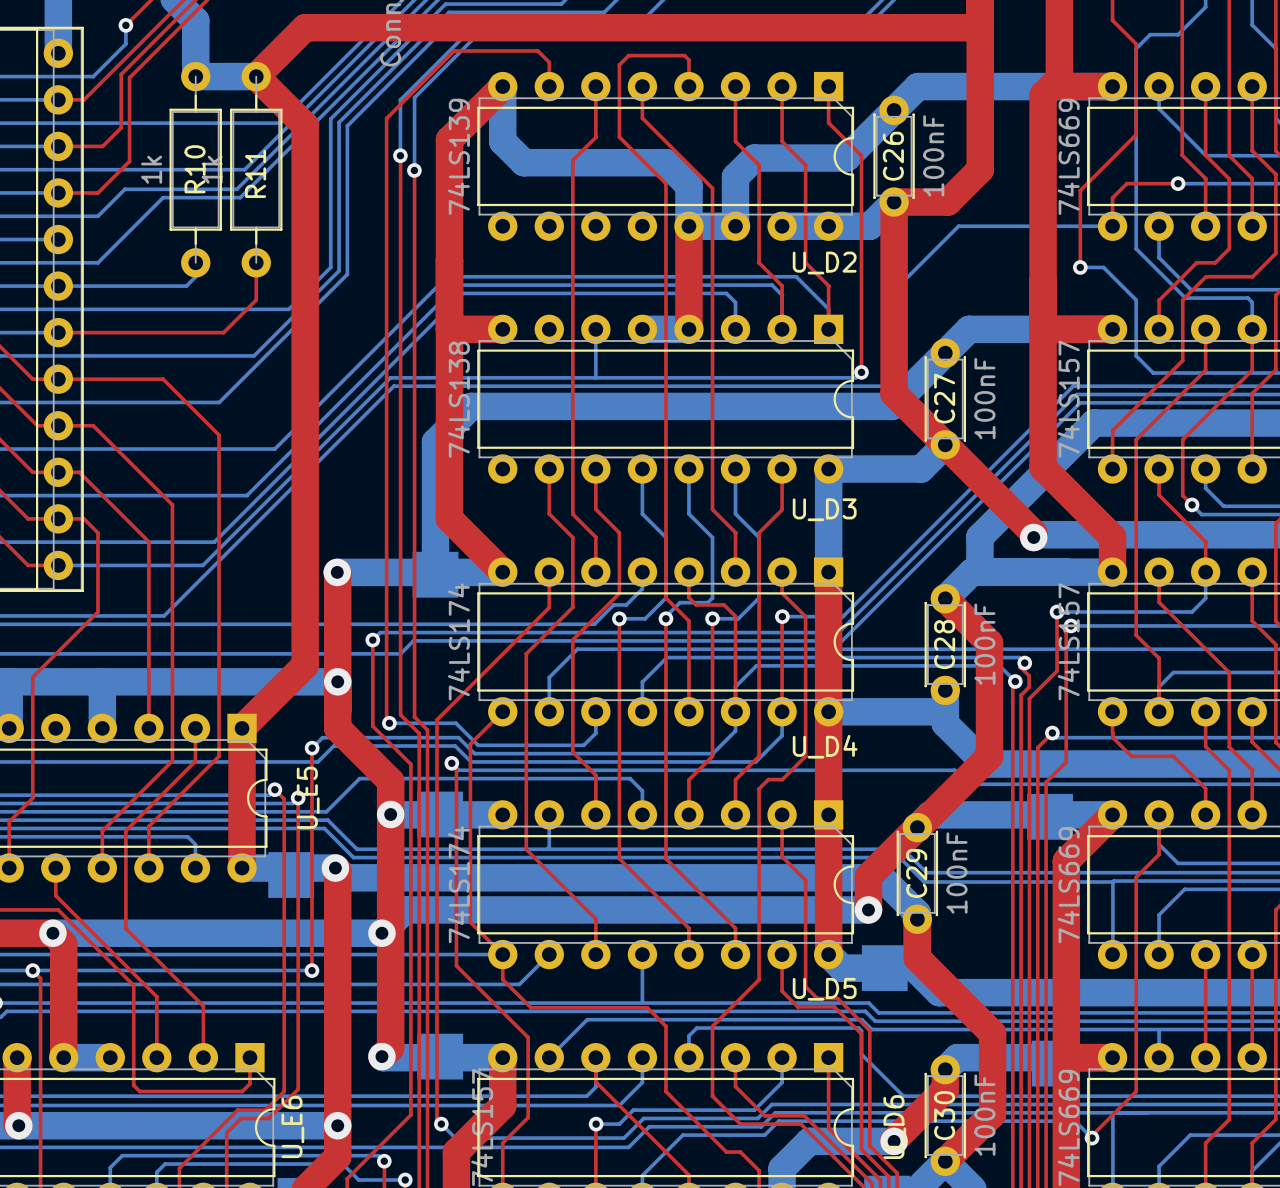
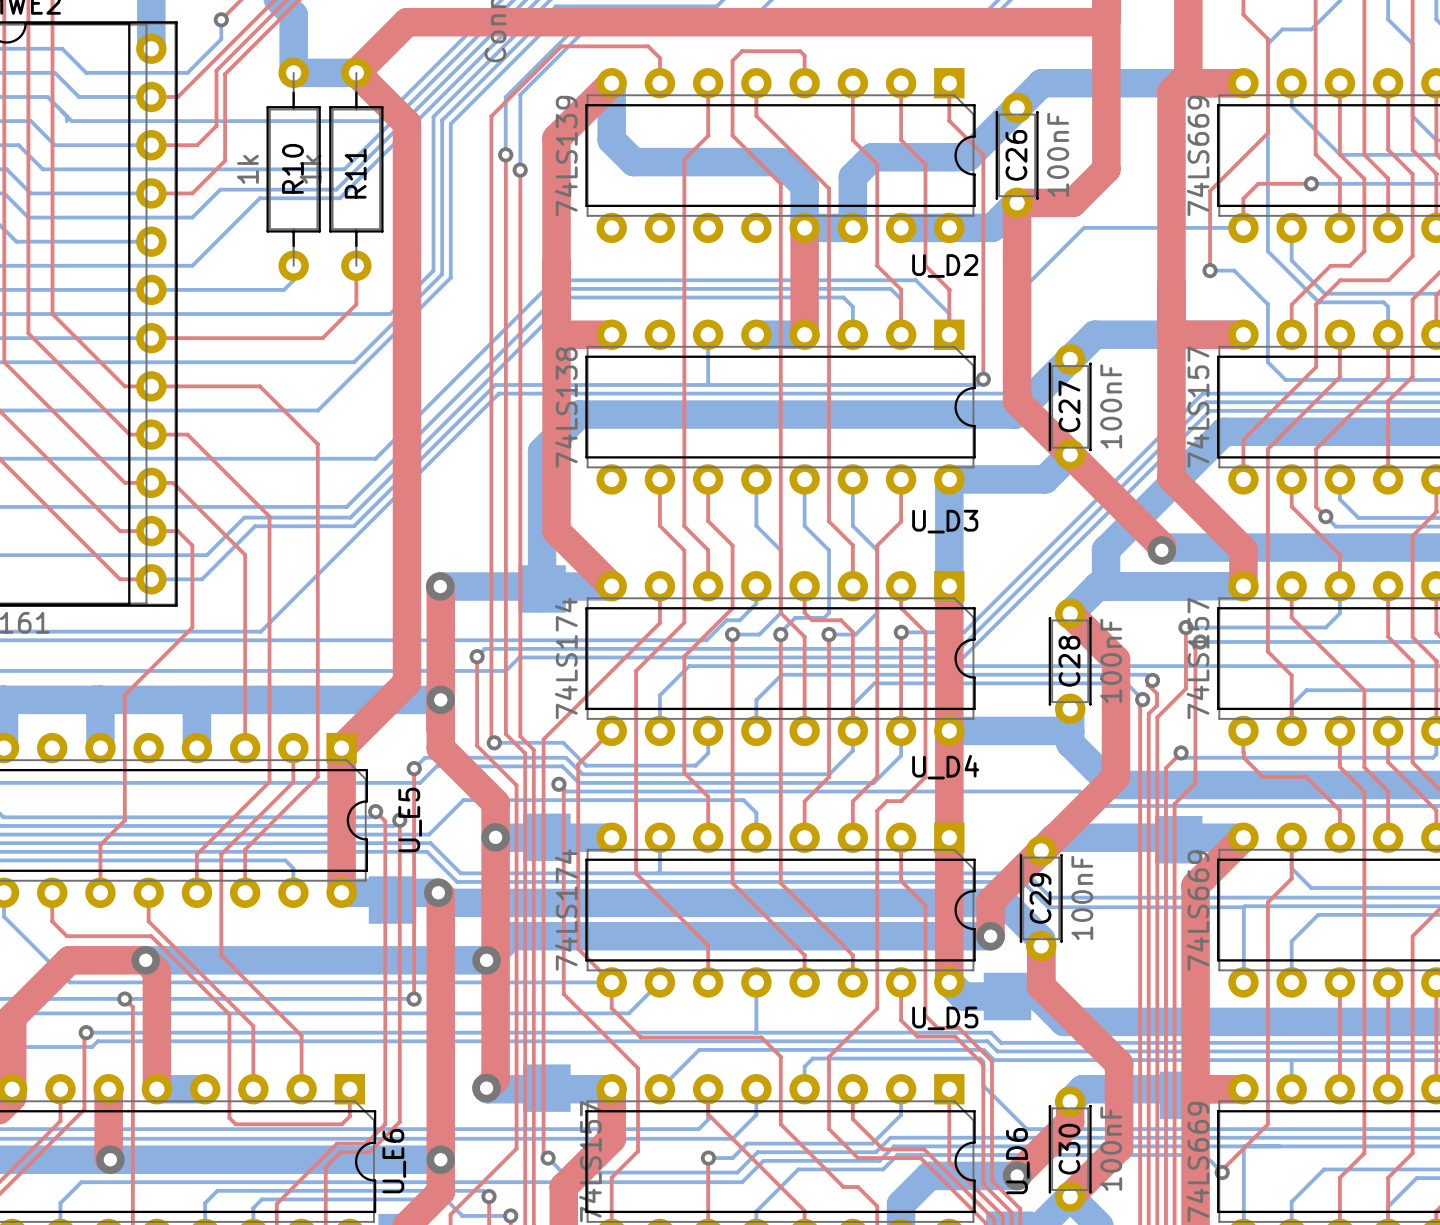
bottom track: (250, 505) (214, 542) (111, 542) -> (350, 517) (244, 517) (206, 555)
bottom track: (254, 514) (202, 565) (107, 565) -> (354, 526) (255, 526) (202, 579)

